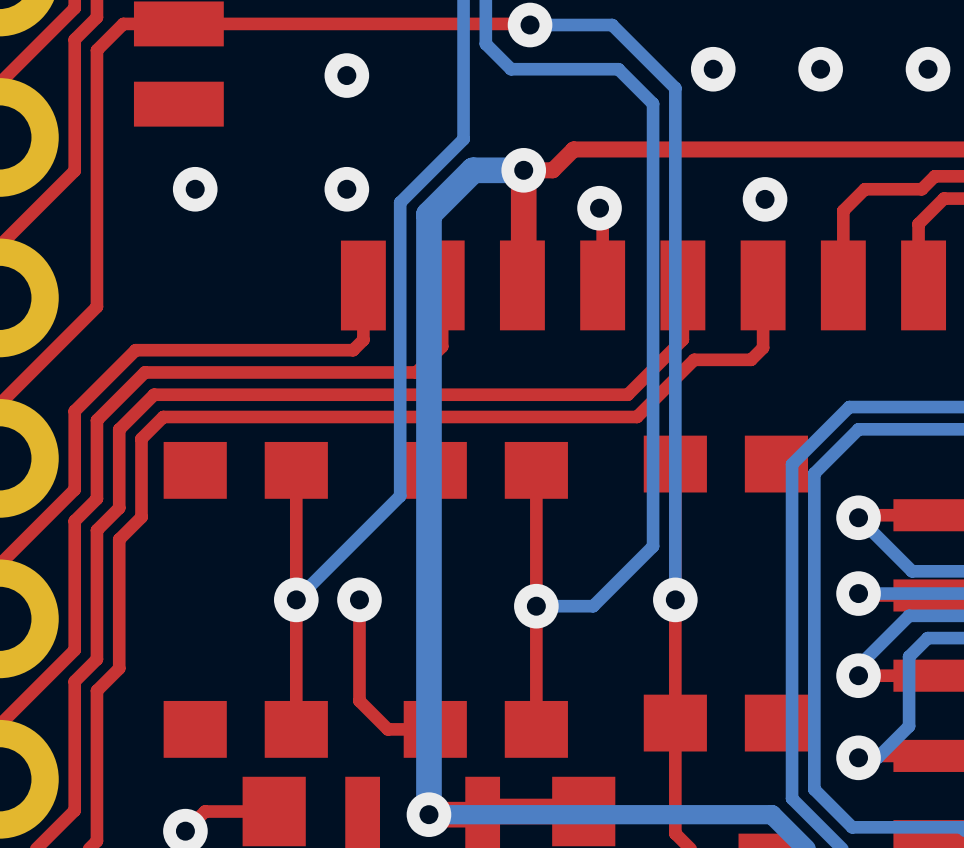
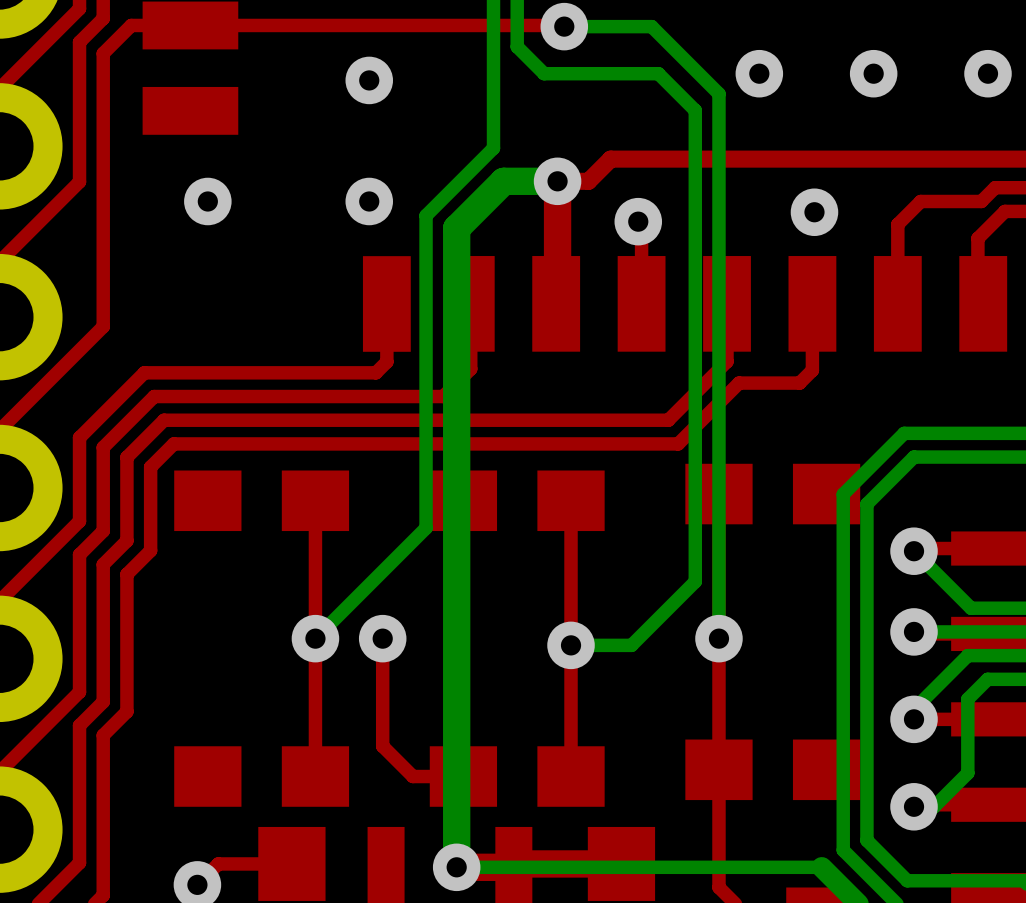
bottom track width: thick (771, 814) (428, 814) -> thin (821, 867) (456, 867)

